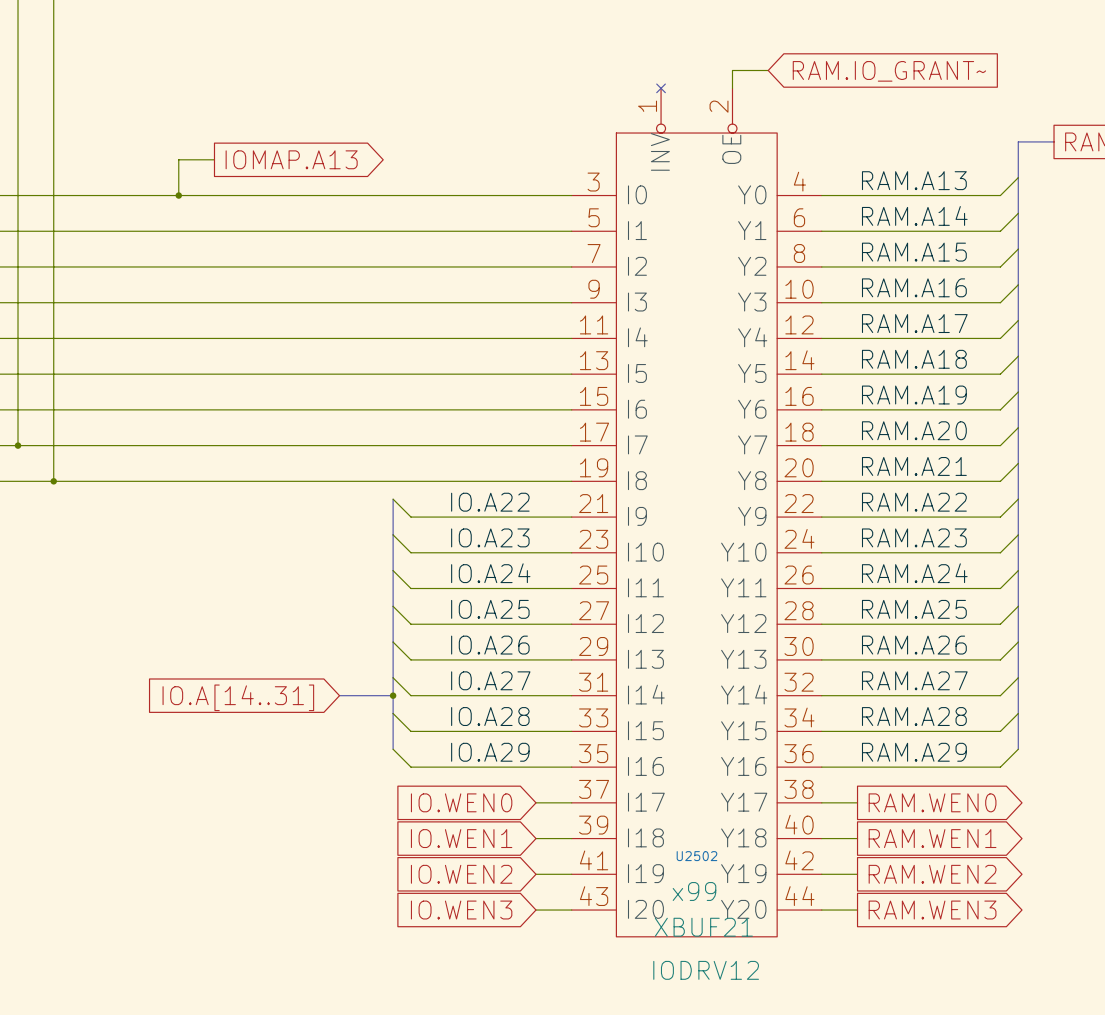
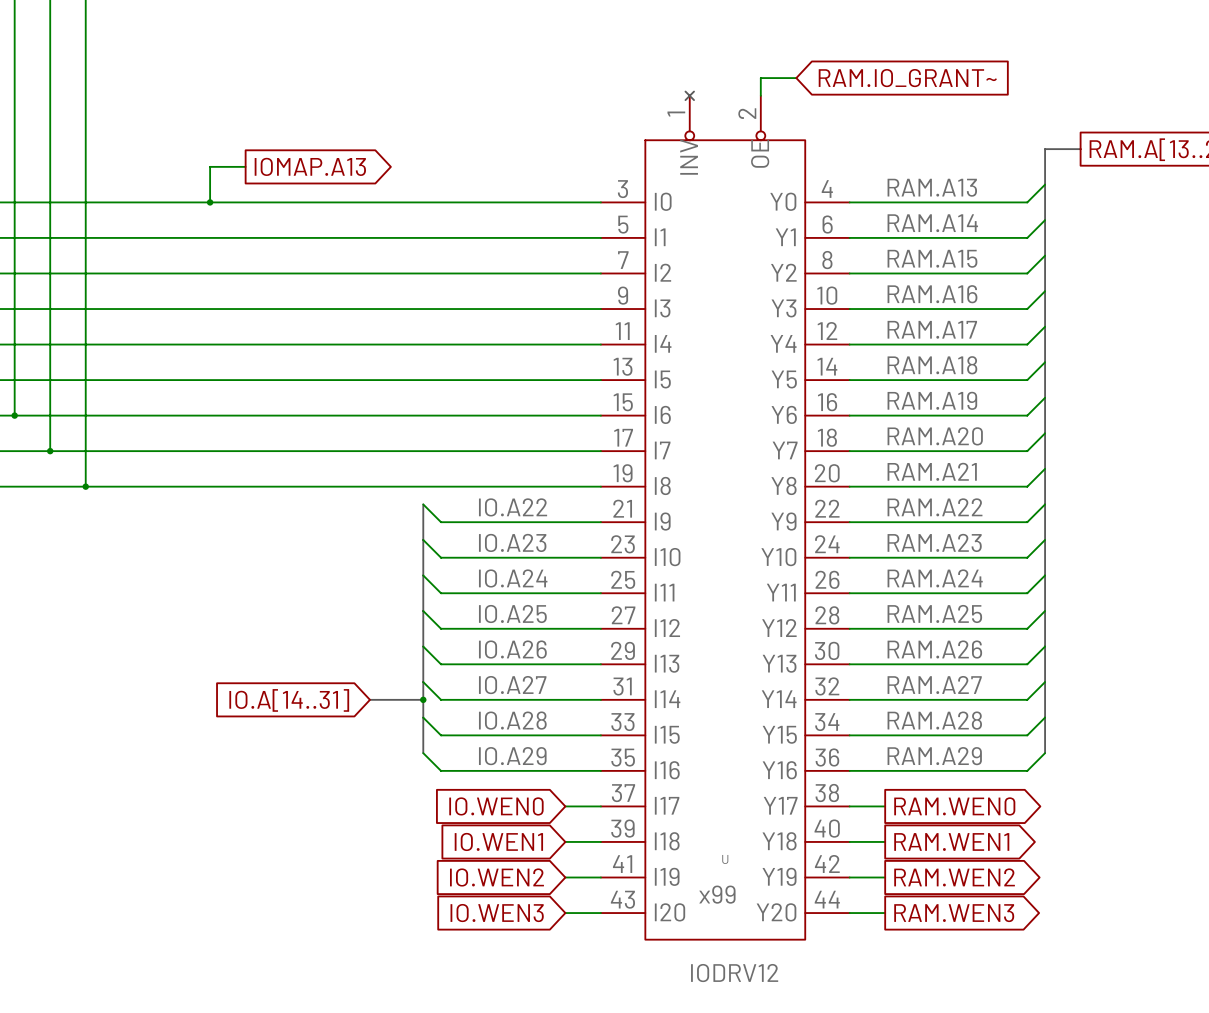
U2502 name: U2502 (696, 856) -> U (725, 859)
U2502 value: XBUF21 (703, 927) -> none

